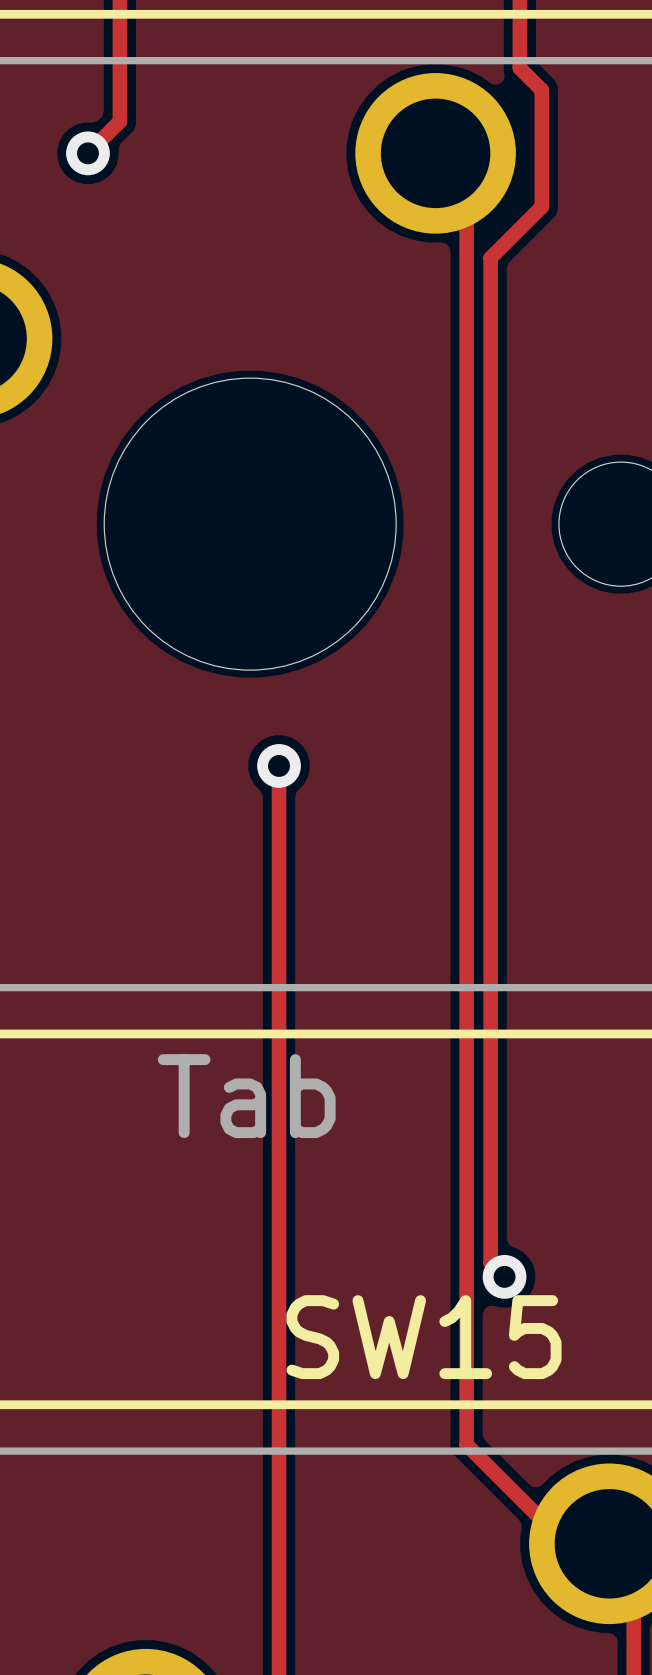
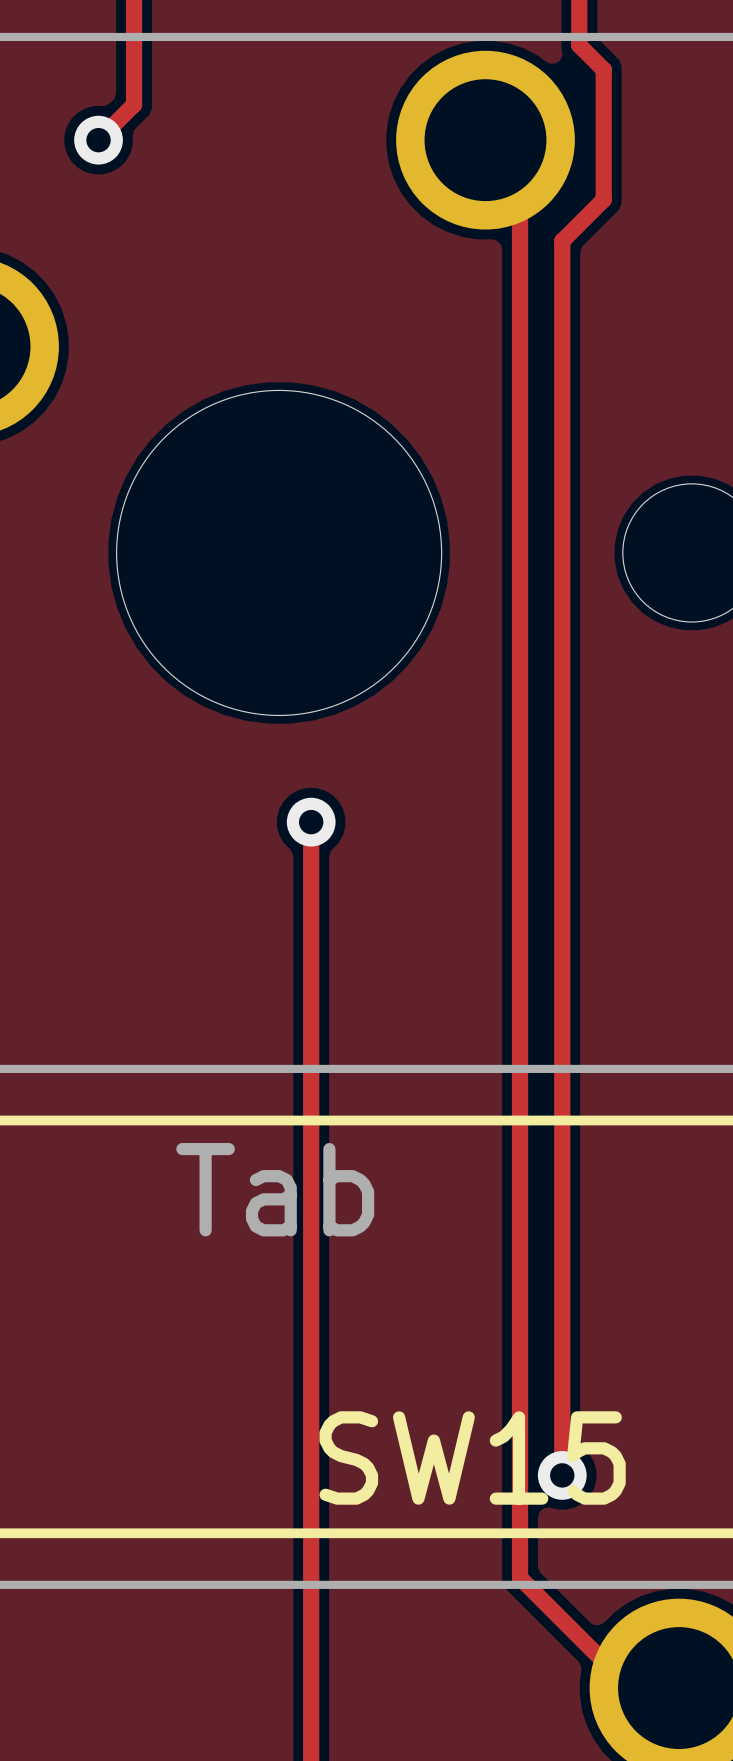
track: (504, 244) (490, 257) (490, 1263) (504, 1276) -> (562, 241) (562, 1475)
via position: (504, 1276) -> (562, 1475)

